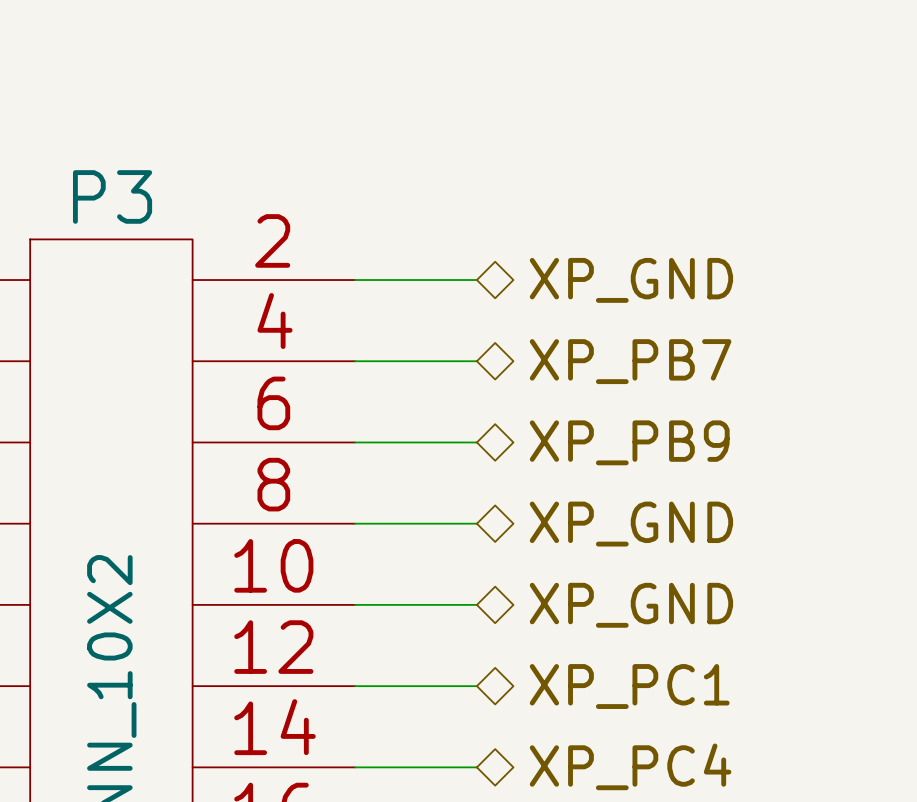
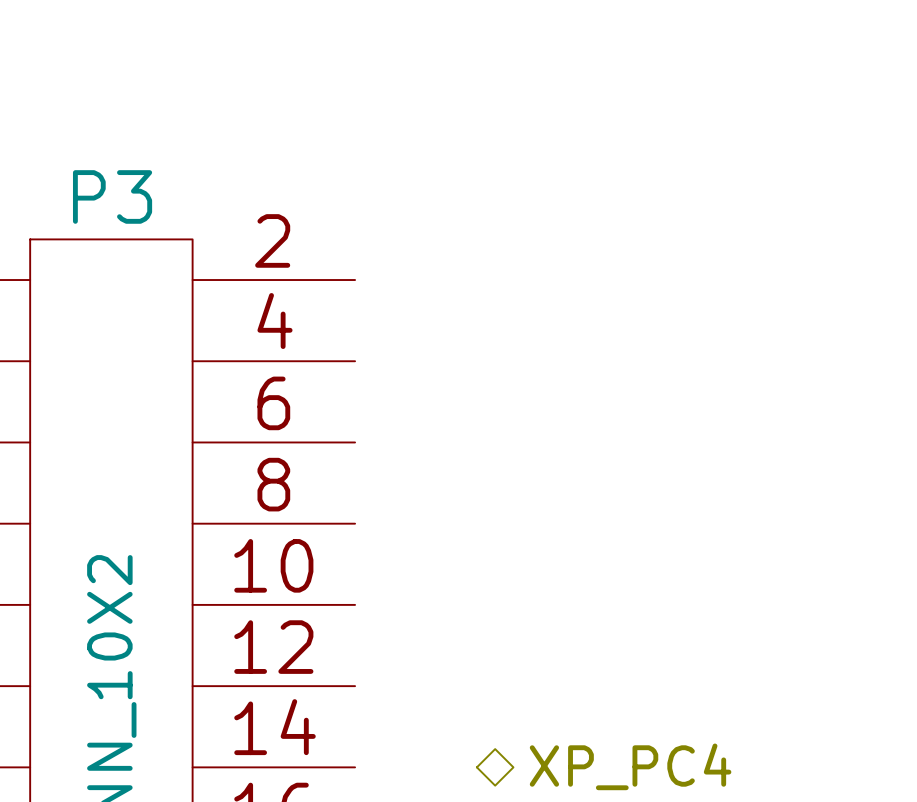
wire: (355, 280) (476, 280) -> none
hierarchical label: XP_GND (631, 280) -> none
wire: (355, 361) (476, 361) -> none
hierarchical label: XP_PB7 (630, 361) -> none
wire: (355, 442) (476, 442) -> none
hierarchical label: XP_PB9 (629, 442) -> none
wire: (355, 523) (476, 523) -> none
hierarchical label: XP_GND (631, 524) -> none
wire: (355, 604) (476, 604) -> none
hierarchical label: XP_GND (631, 605) -> none
wire: (355, 686) (476, 686) -> none
hierarchical label: XP_PC1 (629, 686) -> none
wire: (355, 767) (476, 767) -> none

